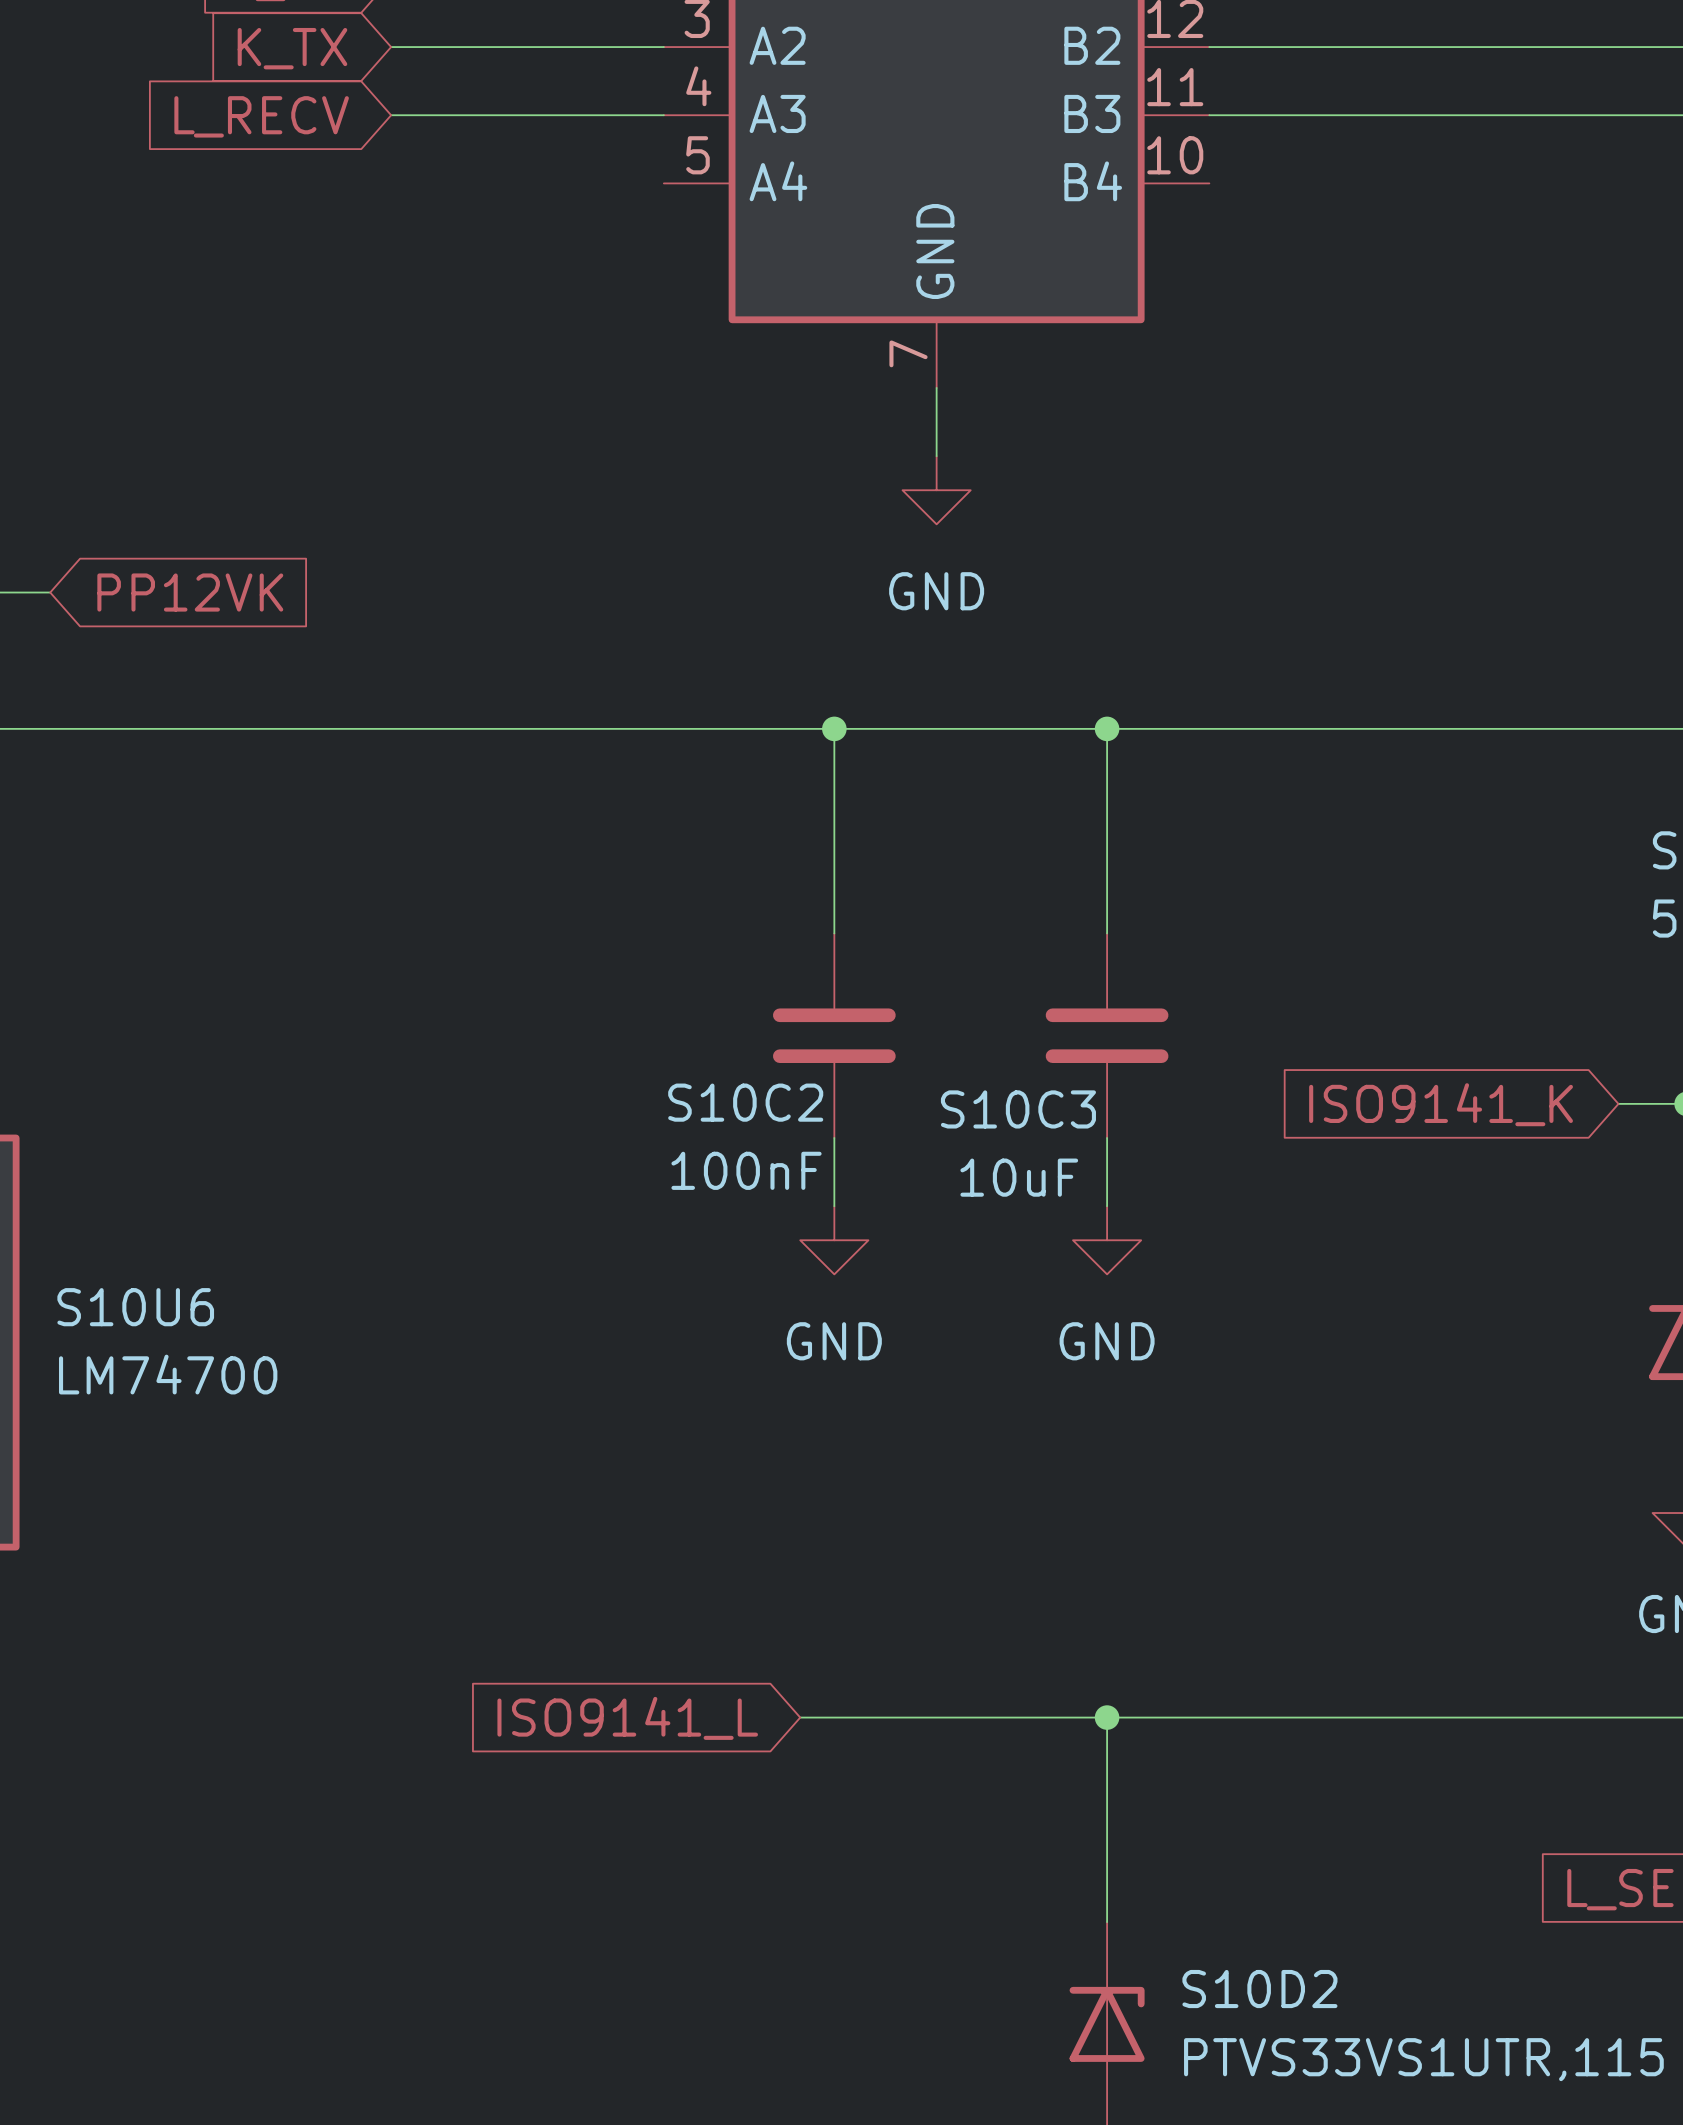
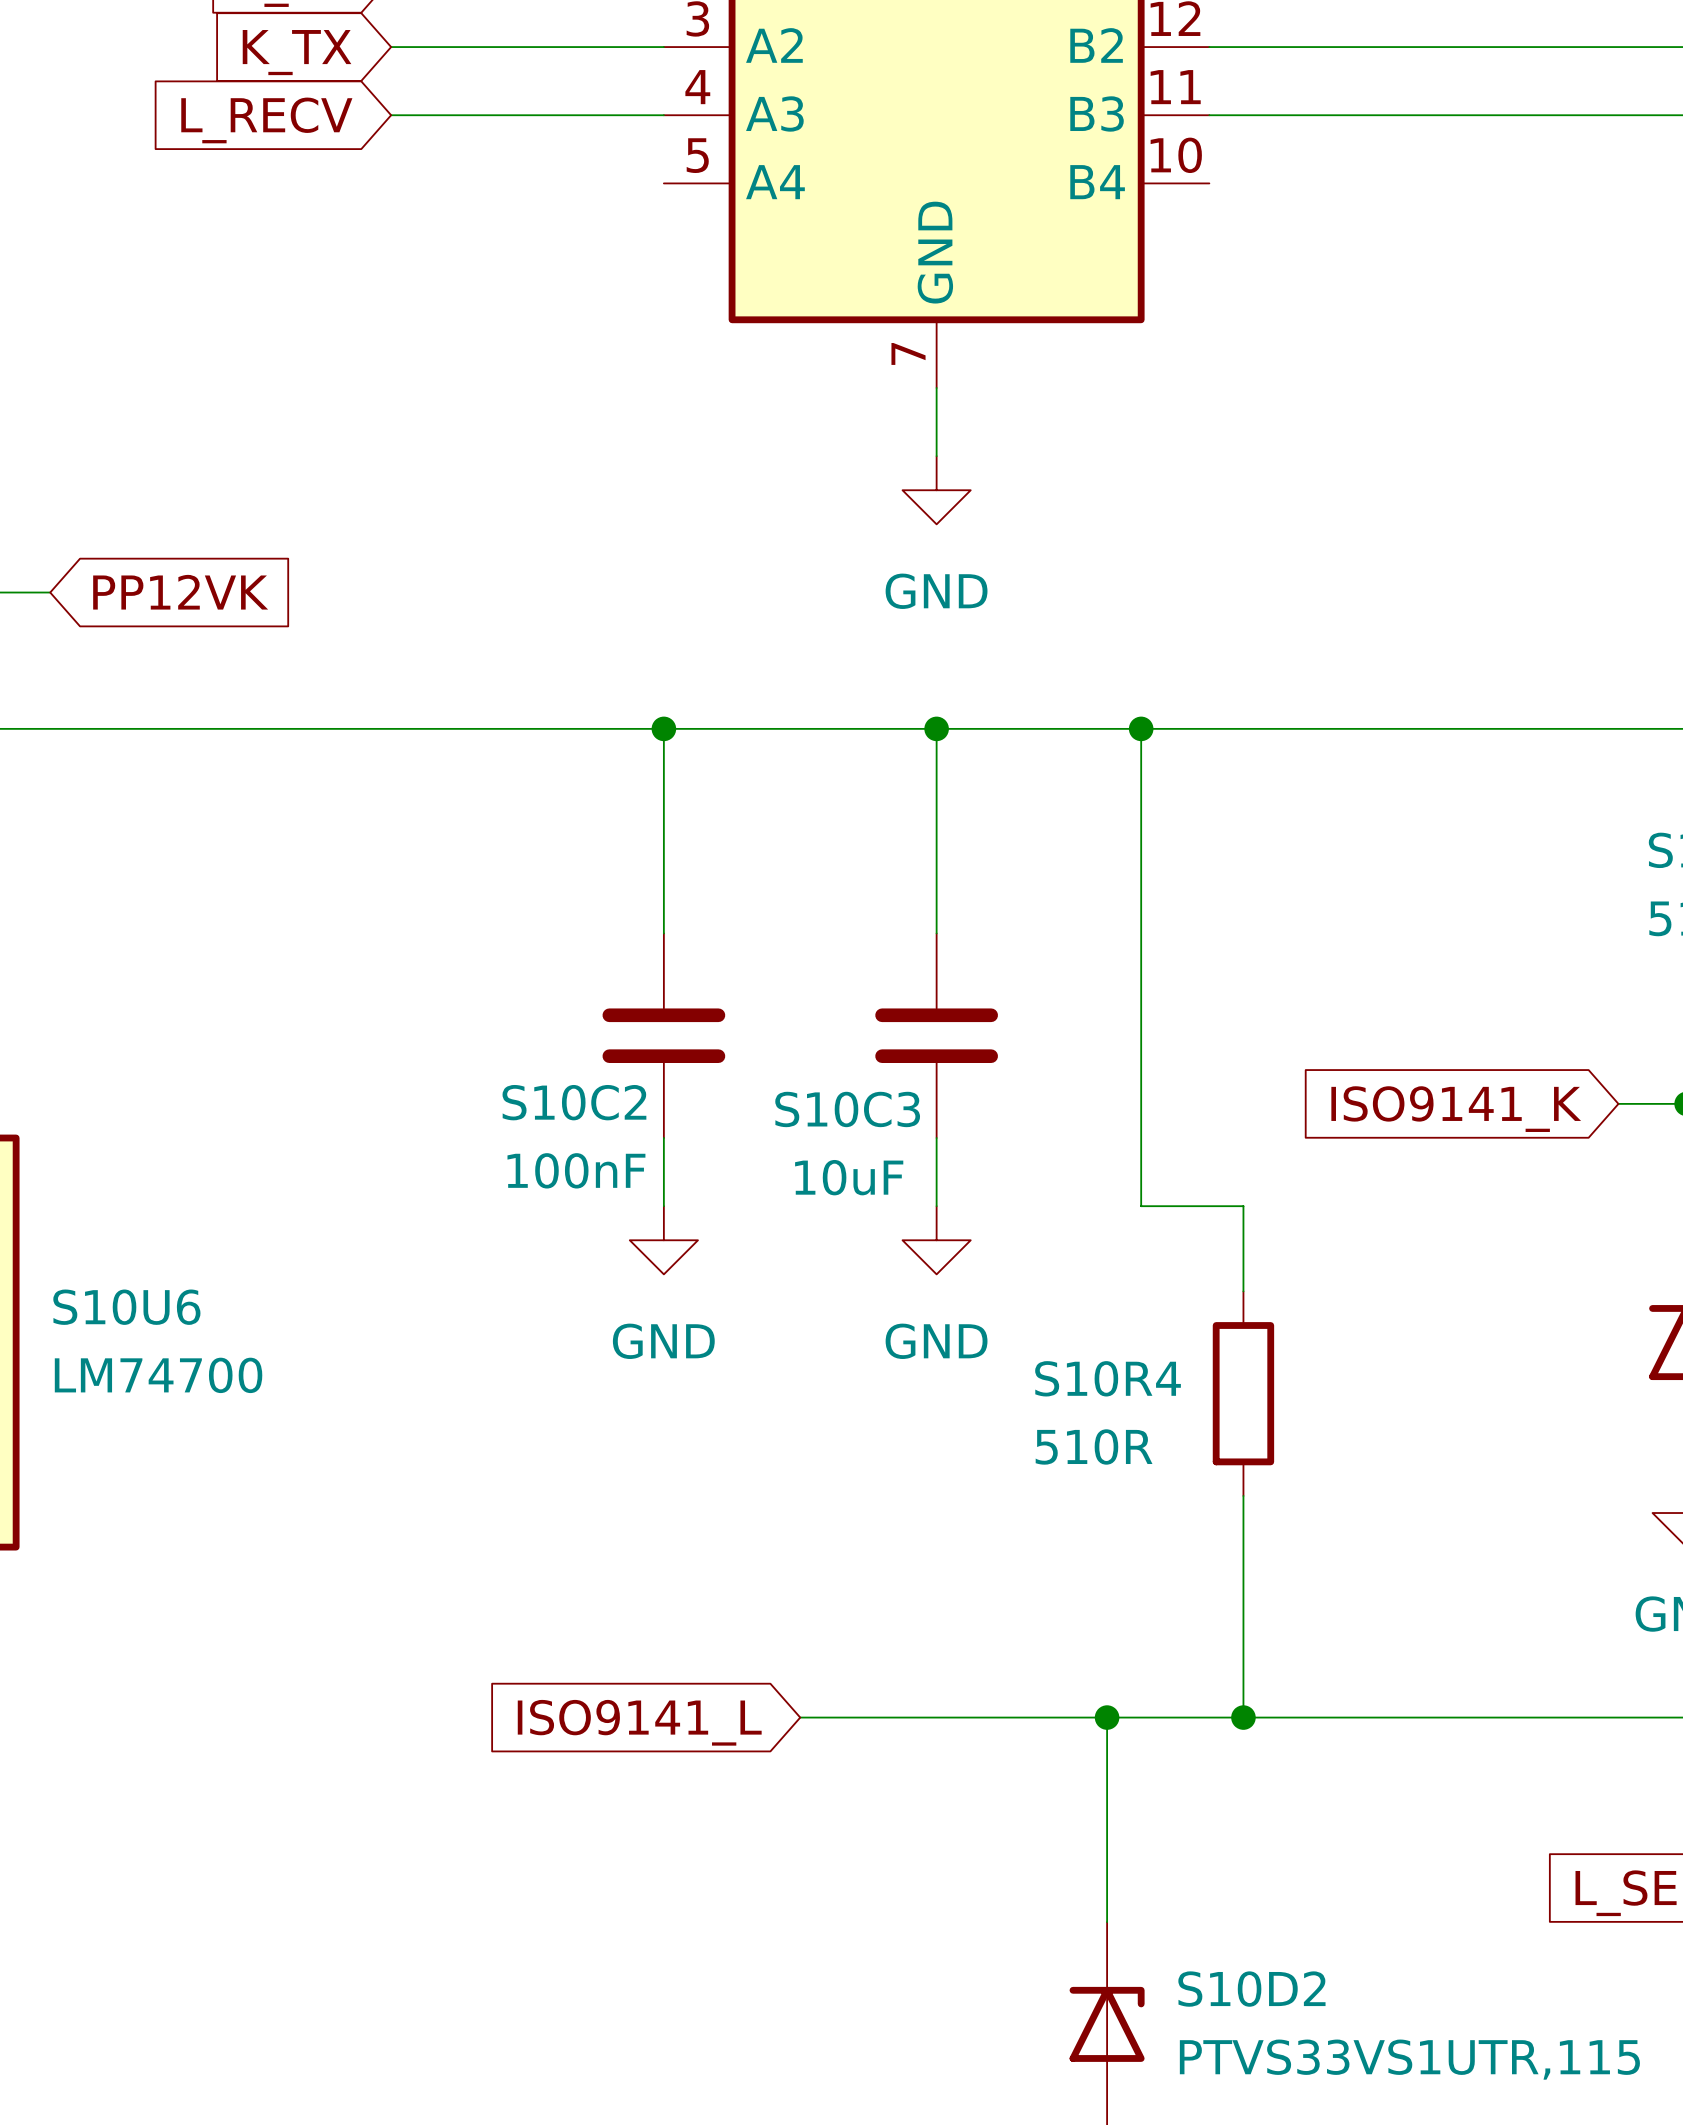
junction: none -> (663, 728)
wire: (834, 728) (834, 933) -> (663, 728) (663, 933)
junction: (834, 728) -> none
junction: none -> (936, 728)
wire: (1107, 728) (1107, 933) -> (936, 728) (936, 933)
junction position: (1107, 728) -> (1141, 728)
wire: none -> (1141, 728) (1141, 1206) (1243, 1206) (1243, 1291)
S10C2 position: (834, 1035) -> (663, 1035)
S10C3 position: (1107, 1035) -> (936, 1035)
wire: (834, 1137) (834, 1206) -> (663, 1137) (663, 1206)
wire: (1107, 1137) (1107, 1206) -> (936, 1137) (936, 1206)
power symbol: none -> GND (663, 1240)
power symbol: GND (834, 1240) -> none
power symbol: none -> GND (936, 1240)
power symbol: GND (1107, 1240) -> none
S10R4: none -> 510R (1243, 1393)
wire: none -> (1243, 1495) (1243, 1717)
junction: none -> (1243, 1717)

